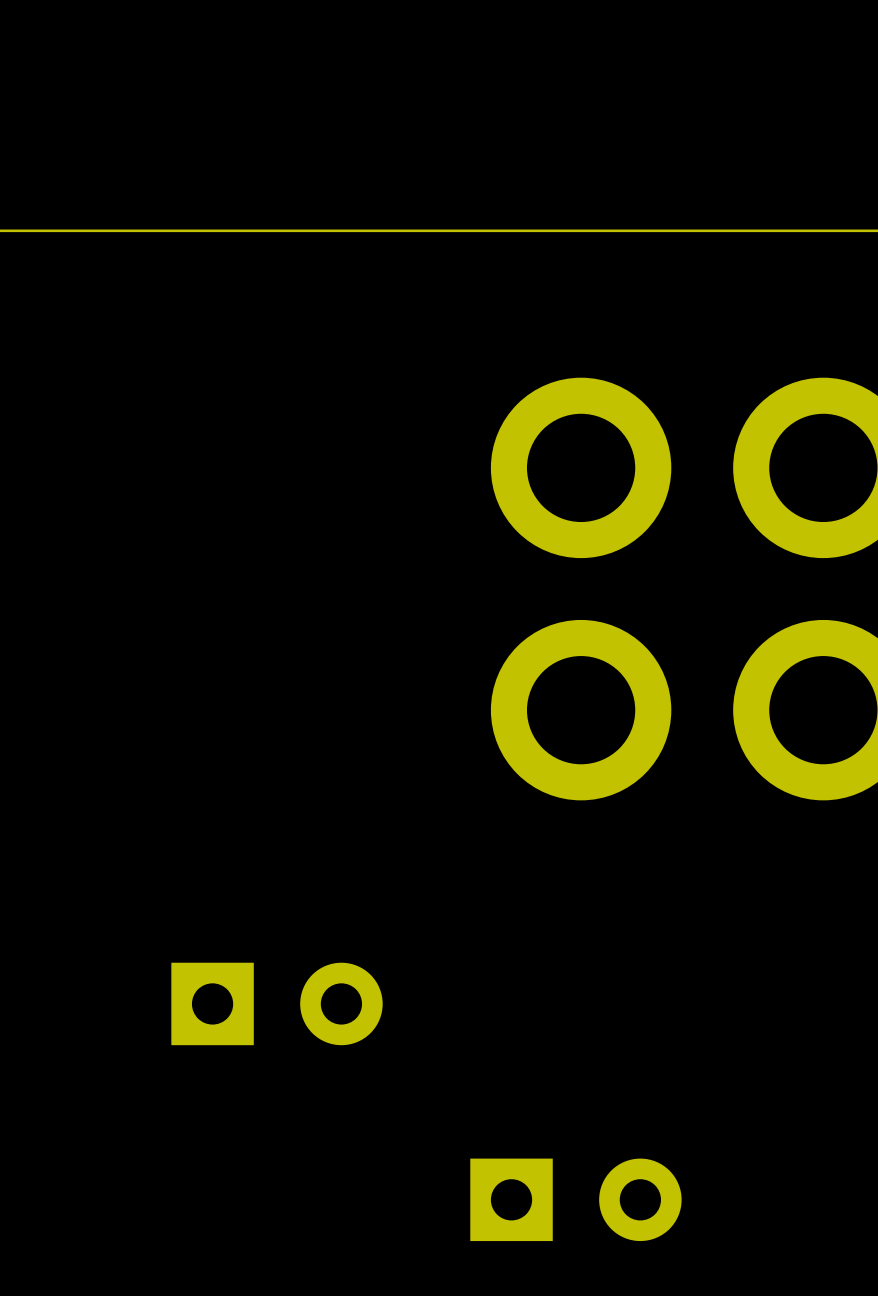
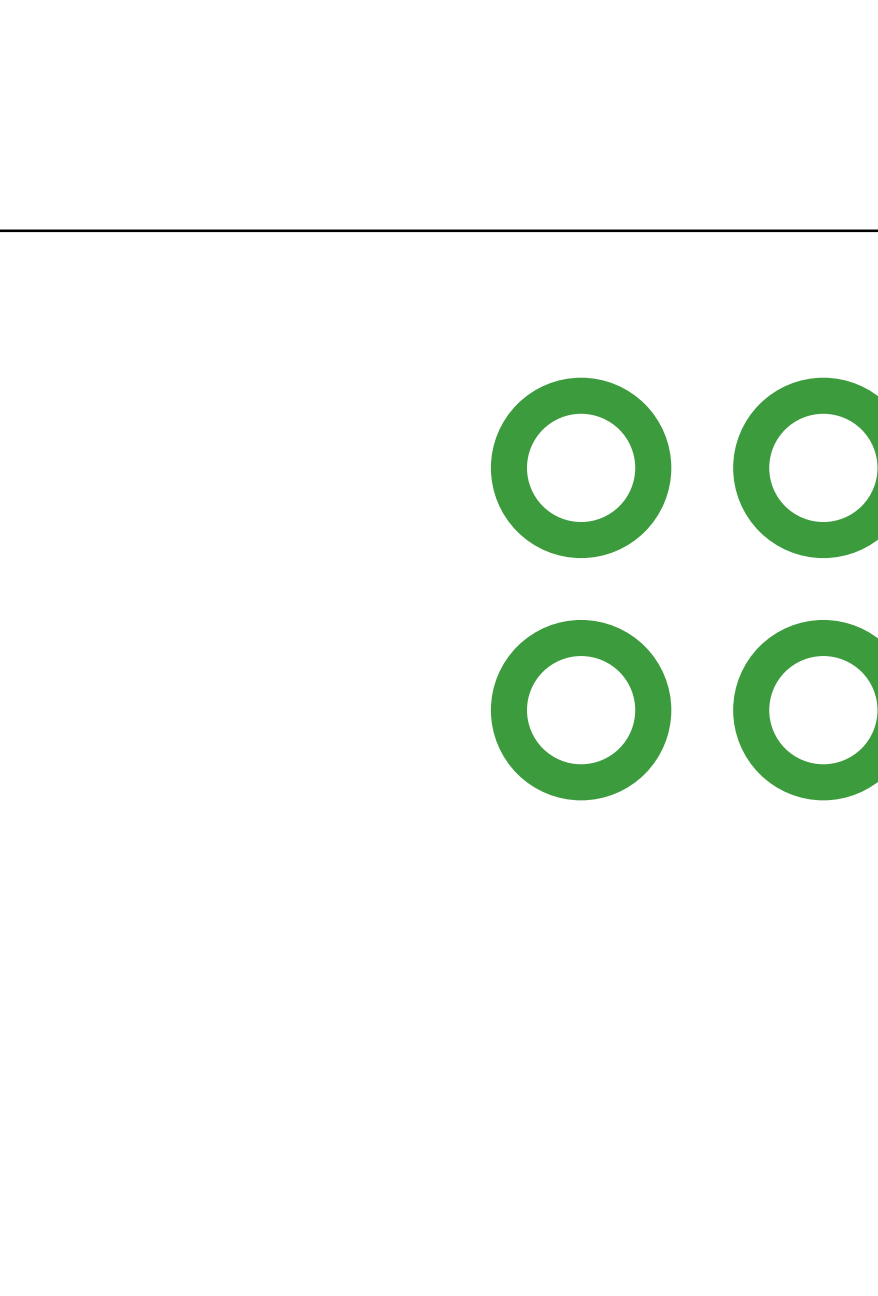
part: (277, 1003) -> none
part: (575, 1199) -> none

